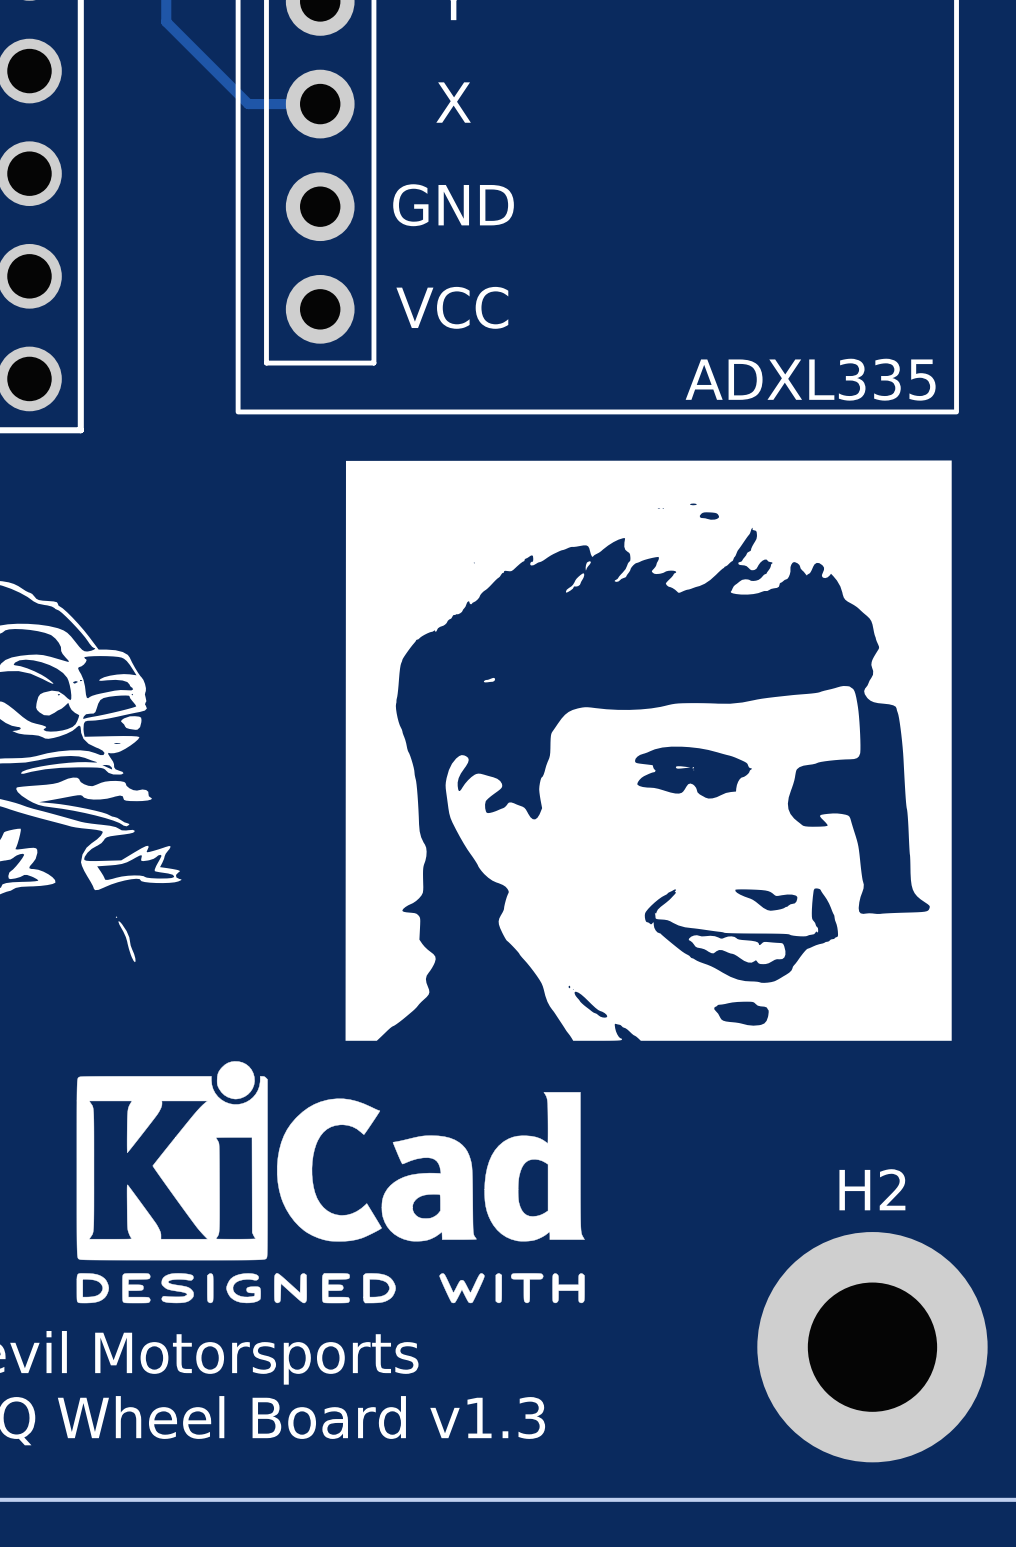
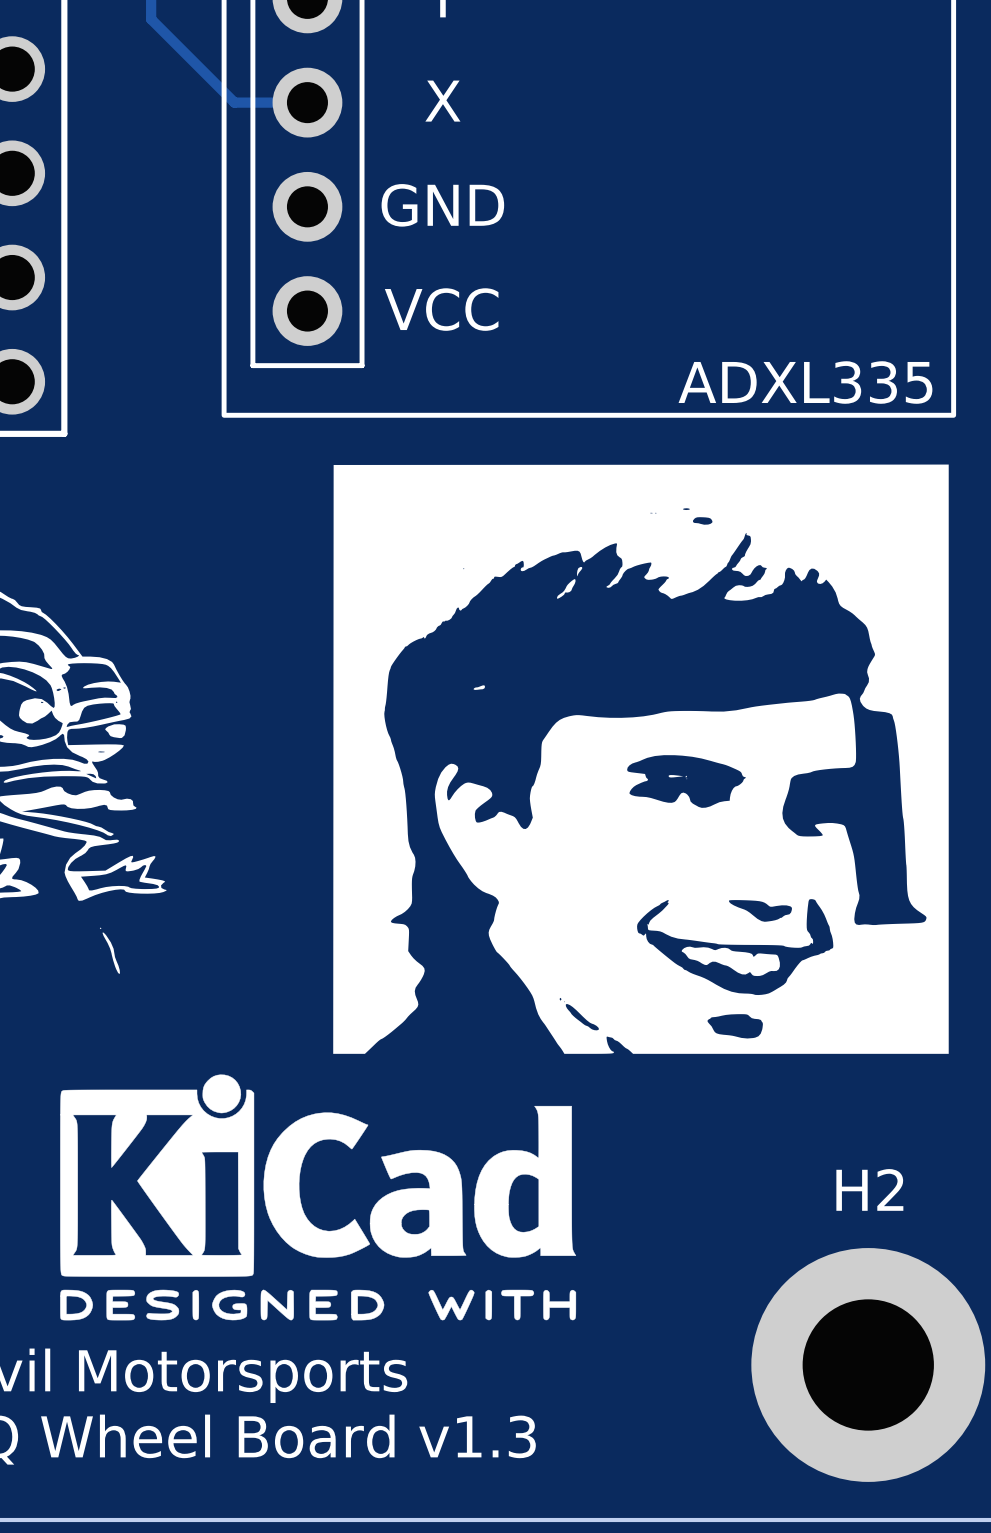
H2 name position: H2 (872, 1189) -> H2 (869, 1189)

